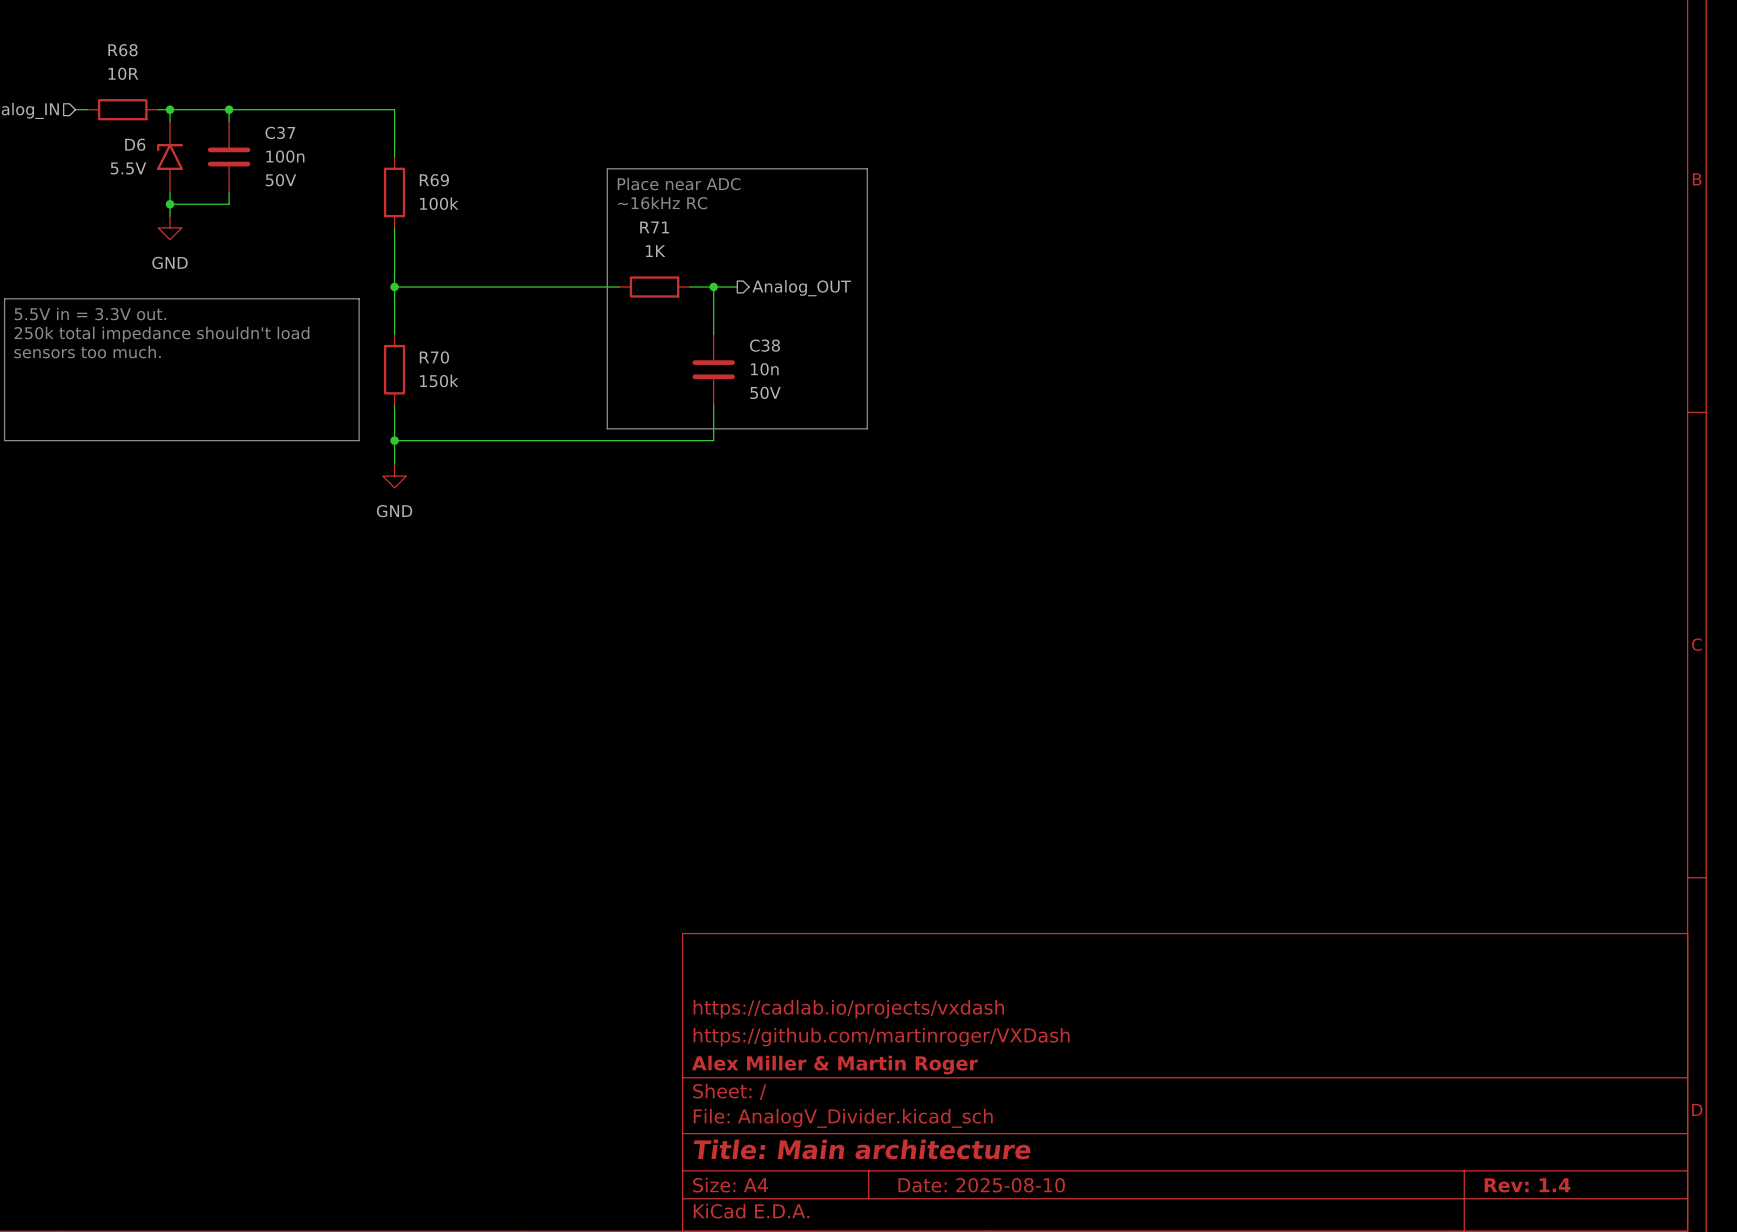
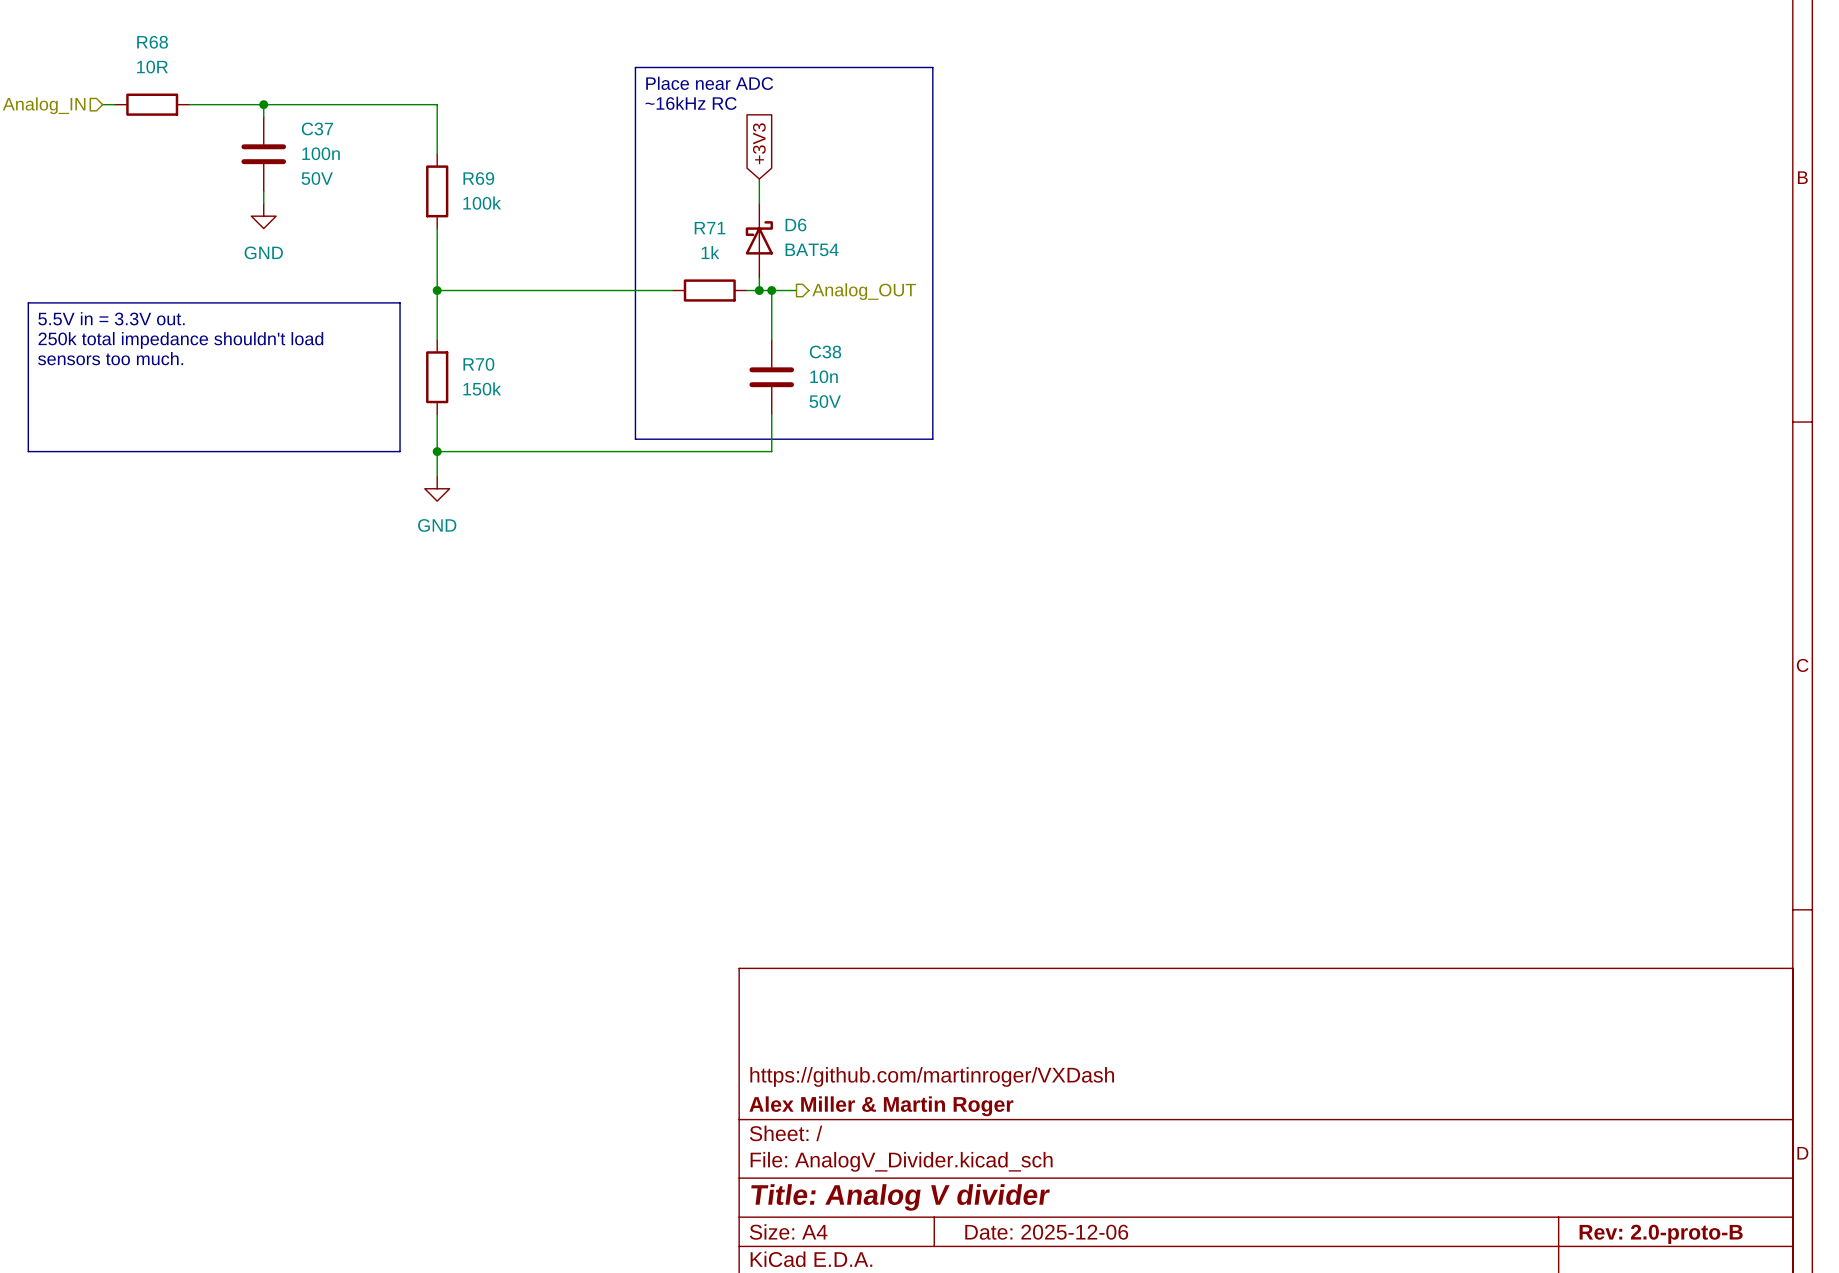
wire: (170, 109) (170, 121) -> none
junction: (170, 109) -> none
D6 symbol: [157, 121, 184, 193] -> [745, 203, 773, 279]
D6 name position: D6 (135, 144) -> D6 (795, 225)
global label: none -> +3V3 (759, 143)
D6 value: 5.5V (128, 168) -> BAT54 (812, 249)
line: (867, 168) (607, 168) (607, 428) -> (932, 166) (932, 67) (635, 67) (635, 439) (660, 439)
wire: none -> (759, 179) (759, 203)
text position: Place near ADC (679, 184) -> Place near ADC (709, 83)
wire: (170, 192) (170, 216) -> none
text position: ~16kHz RC (662, 203) -> ~16kHz RC (691, 103)
wire: (170, 204) (229, 204) -> none
junction: (170, 204) -> none
power symbol position: GND (170, 227) -> GND (263, 216)
R71 value: 1K (655, 251) -> 1k (710, 252)
wire: none -> (759, 278) (759, 290)
junction: none -> (759, 290)
title block: https://cadlab.io/projects/vxdash (848, 1009) -> none
title block: Title: Main architecture (862, 1149) -> Title: Analog V divider (900, 1197)
title block: Date: 2025-08-10 (981, 1185) -> Date: 2025-12-06 (1046, 1232)
title block: Rev: 1.4 (1527, 1185) -> Rev: 2.0-proto-B (1661, 1234)

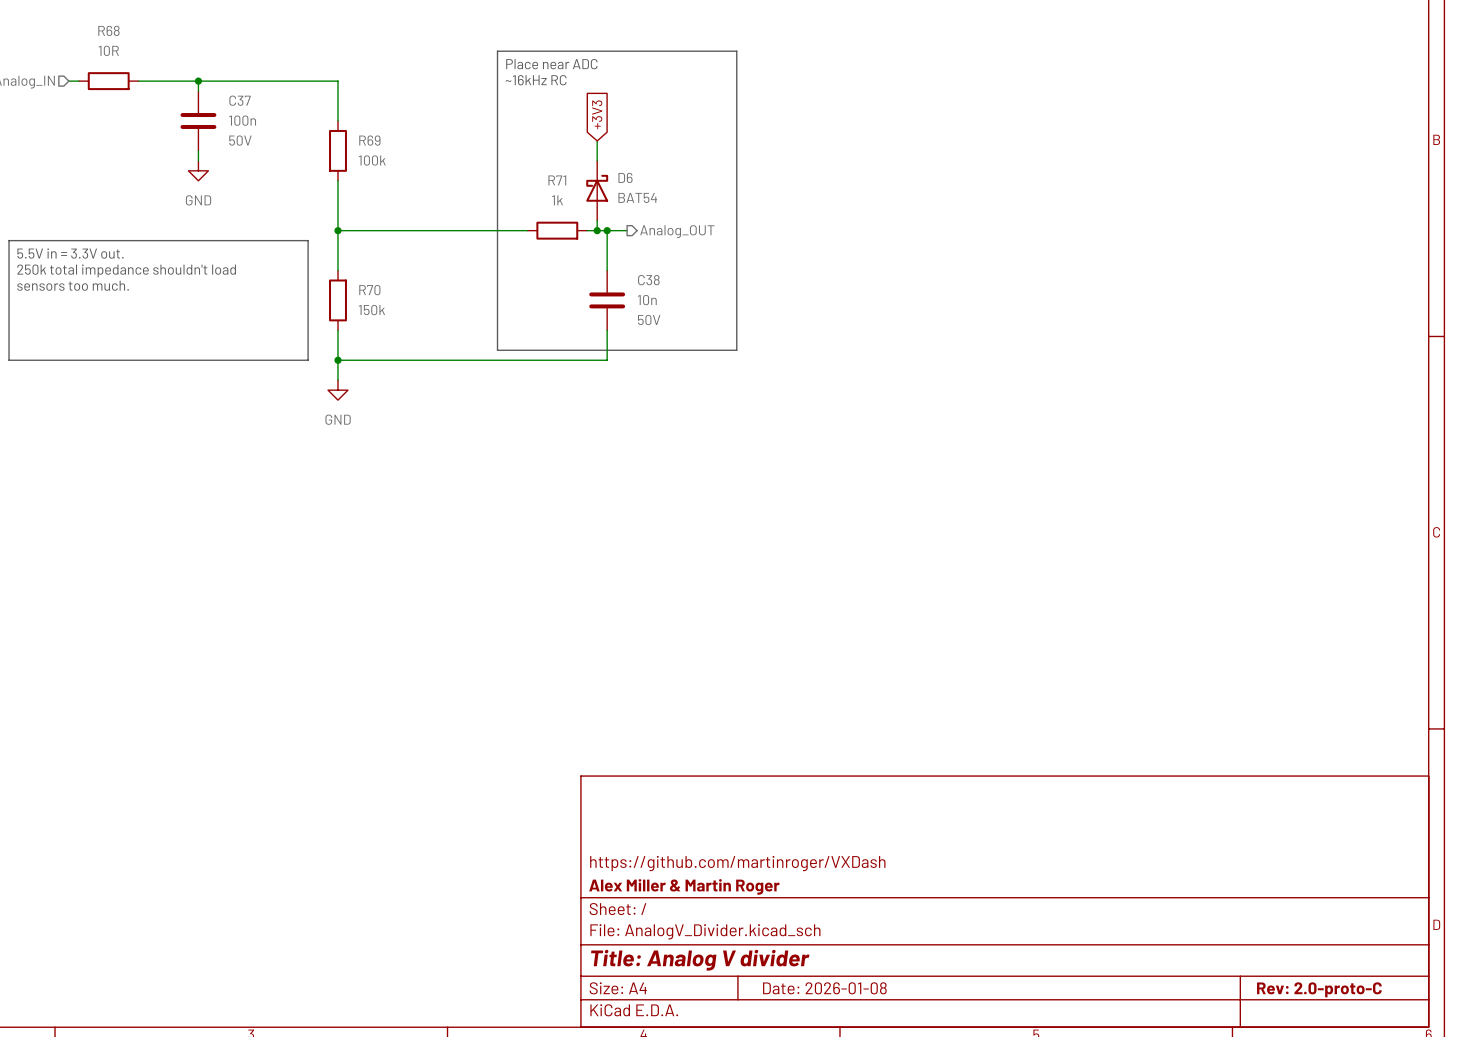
title block: Date: 2025-12-06 (1046, 1232) -> Date: 2026-01-08 (824, 988)
title block: Rev: 2.0-proto-B (1661, 1234) -> Rev: 2.0-proto-C (1319, 989)

